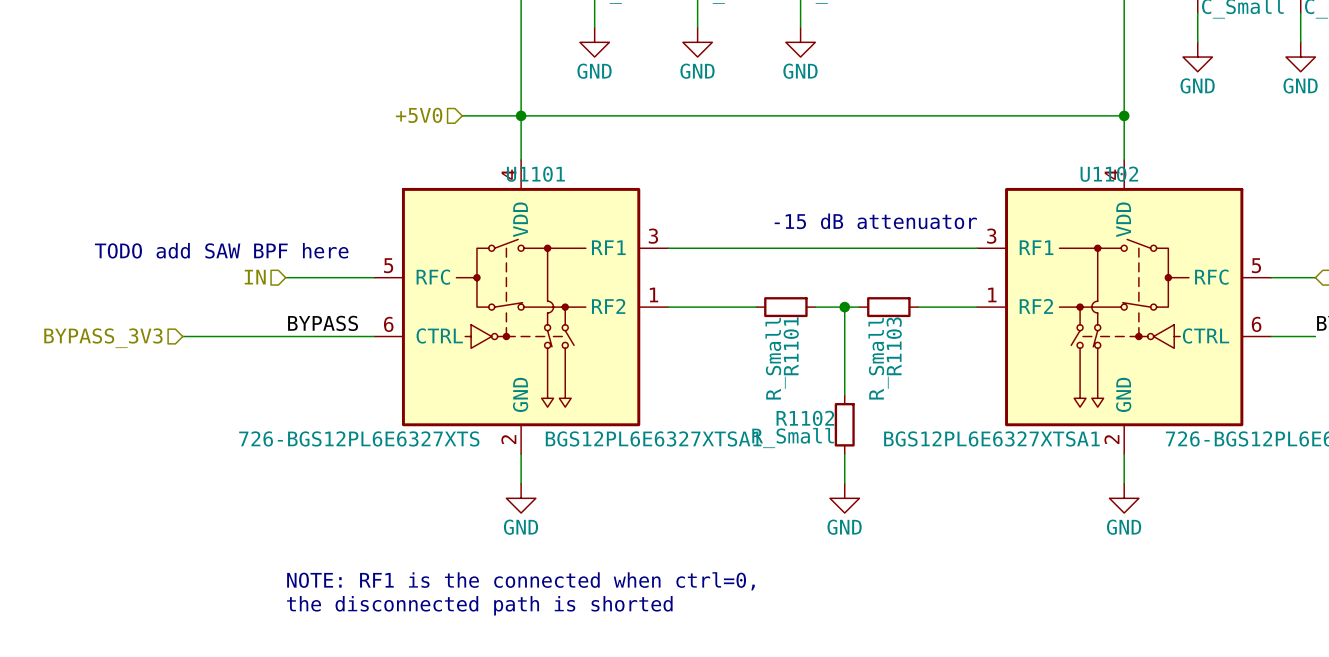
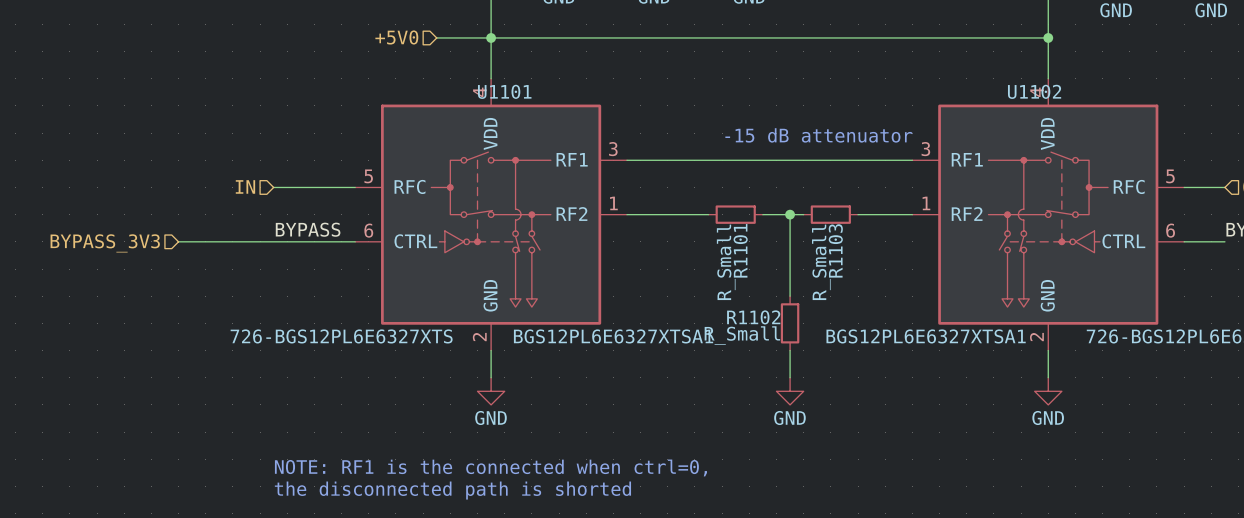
text: TODO add SAW BPF here (221, 250) -> none

